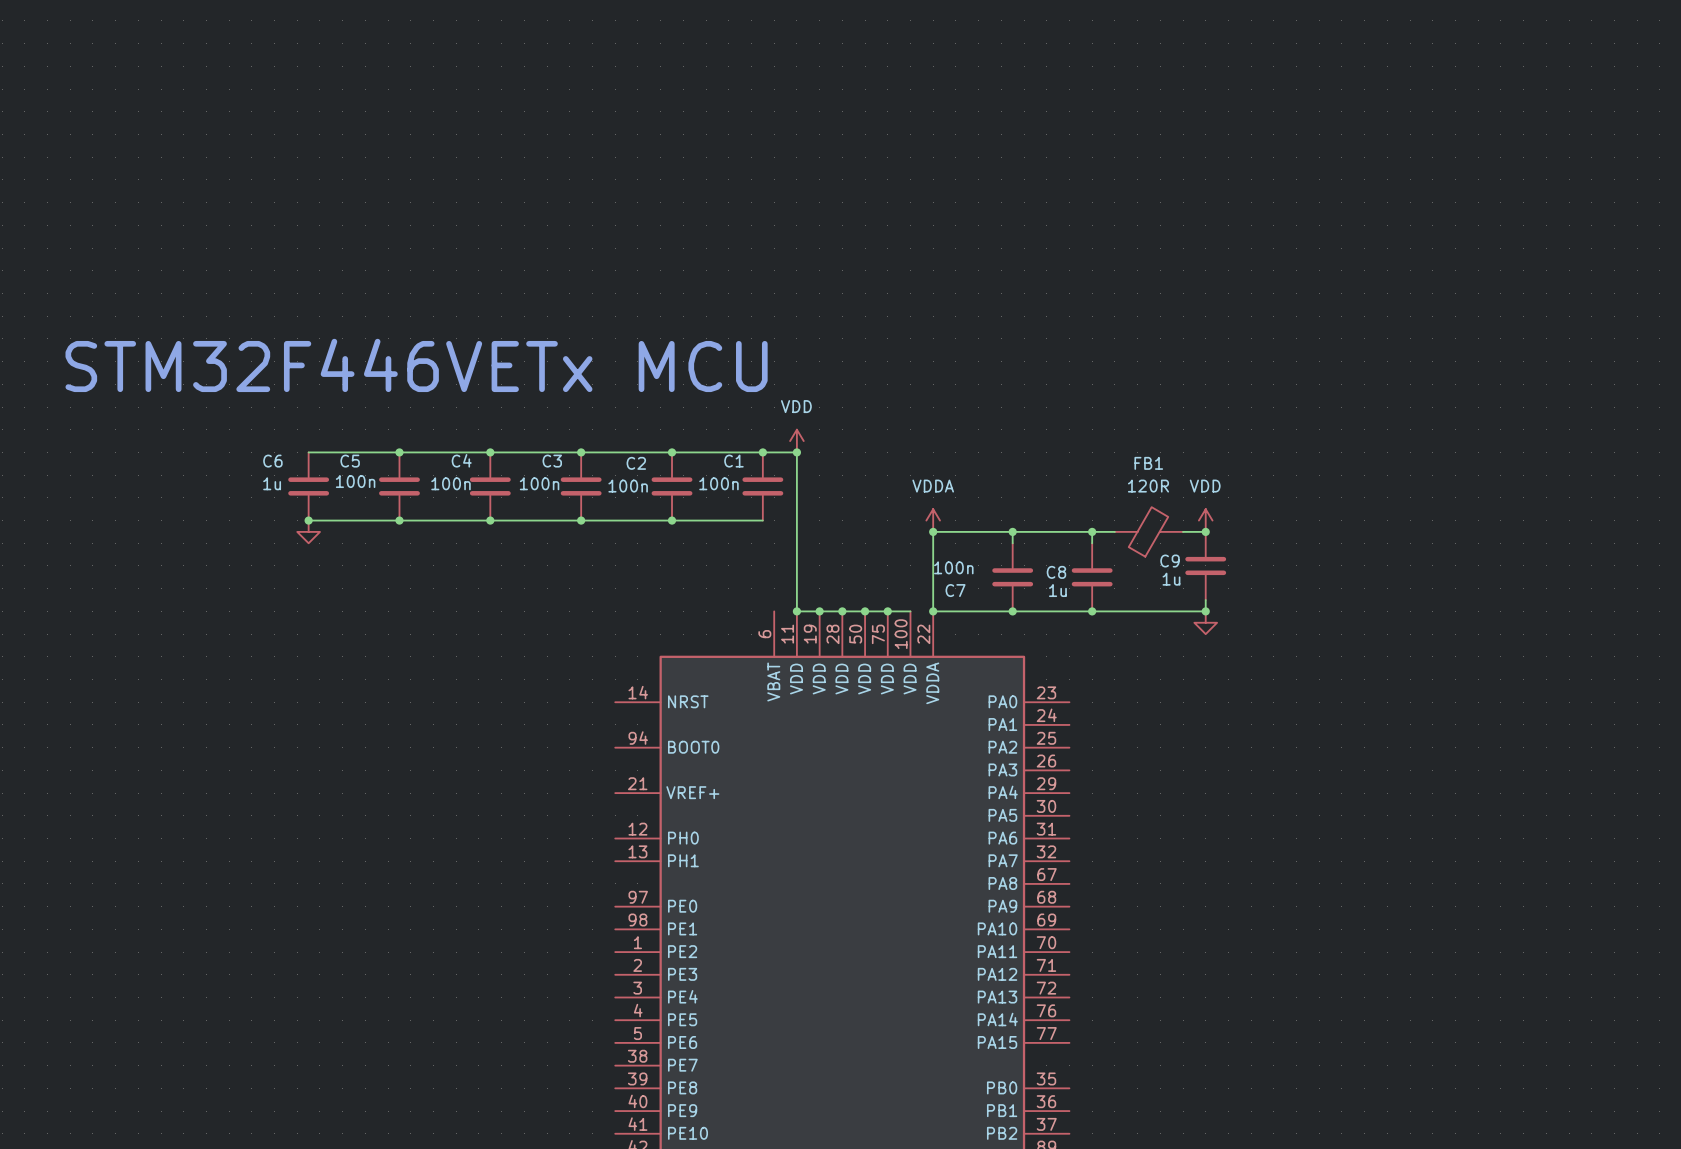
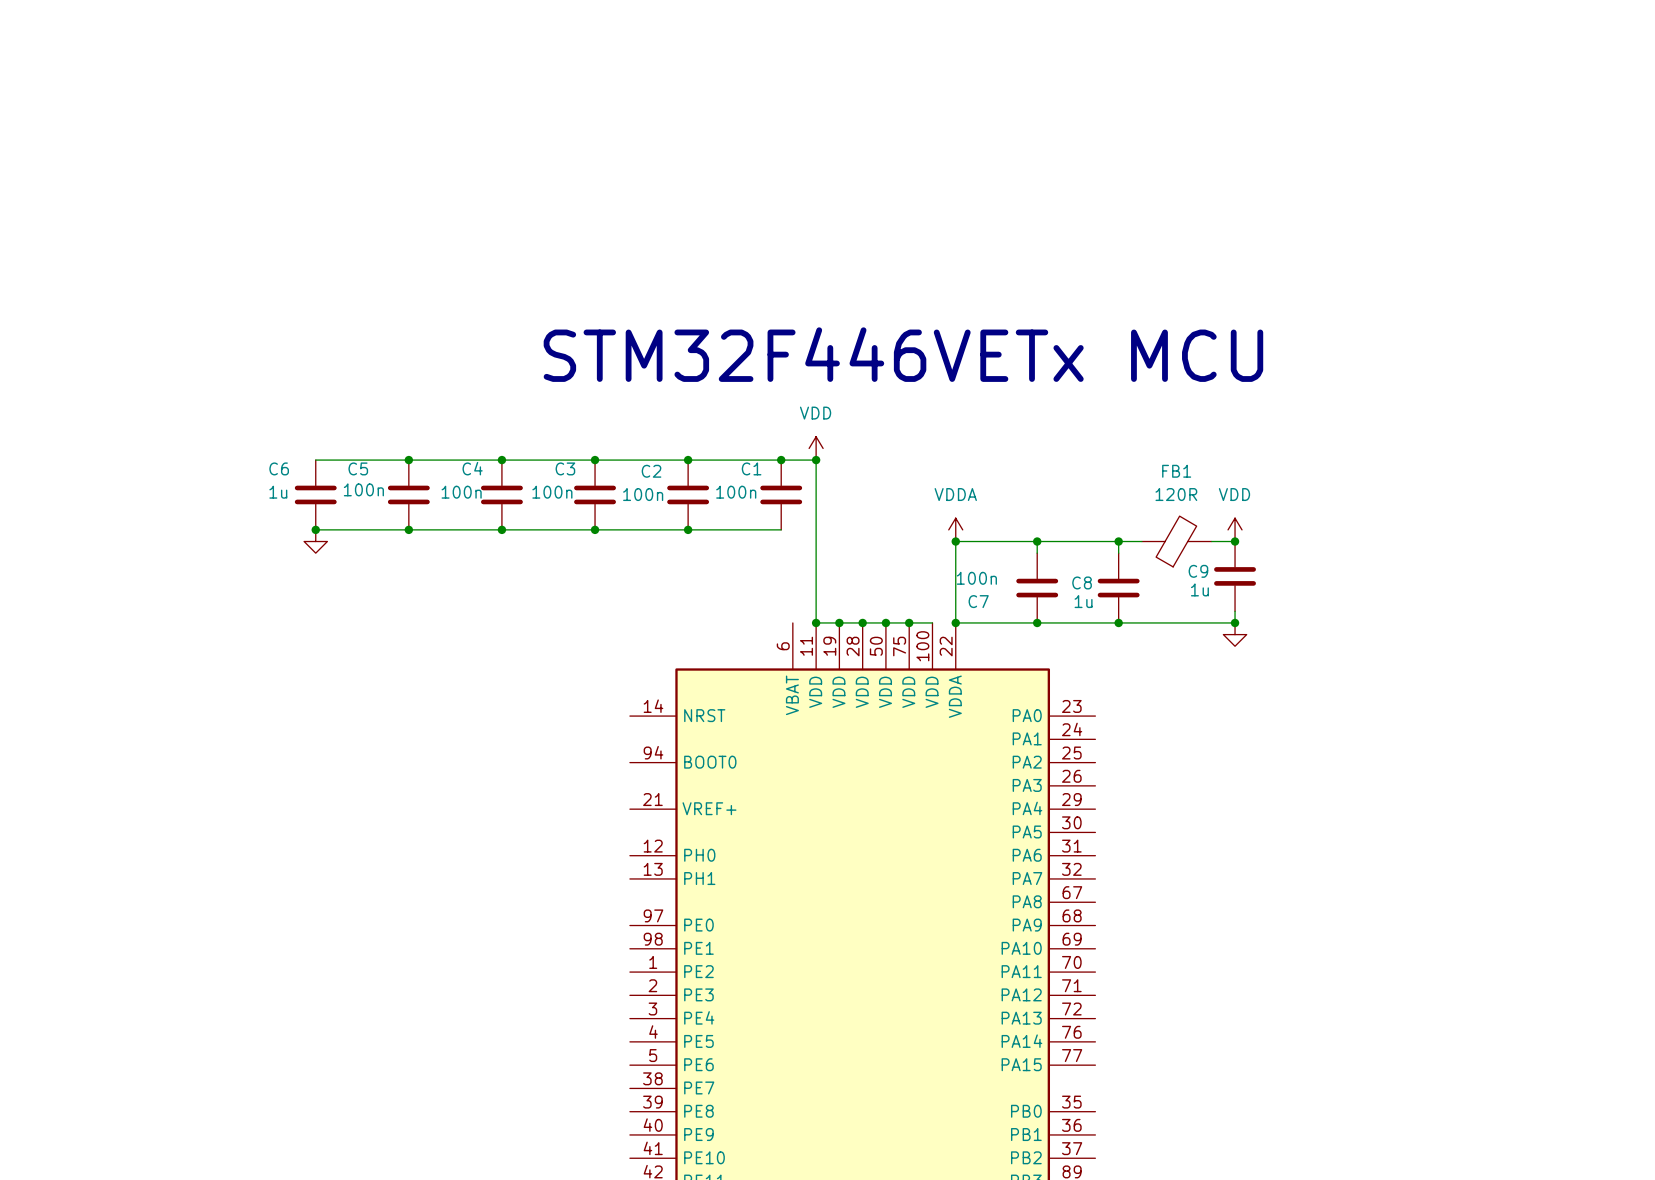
text: none -> STM32F446VETx MCU (903, 354)
text: STM32F446VETx MCU (416, 365) -> none

